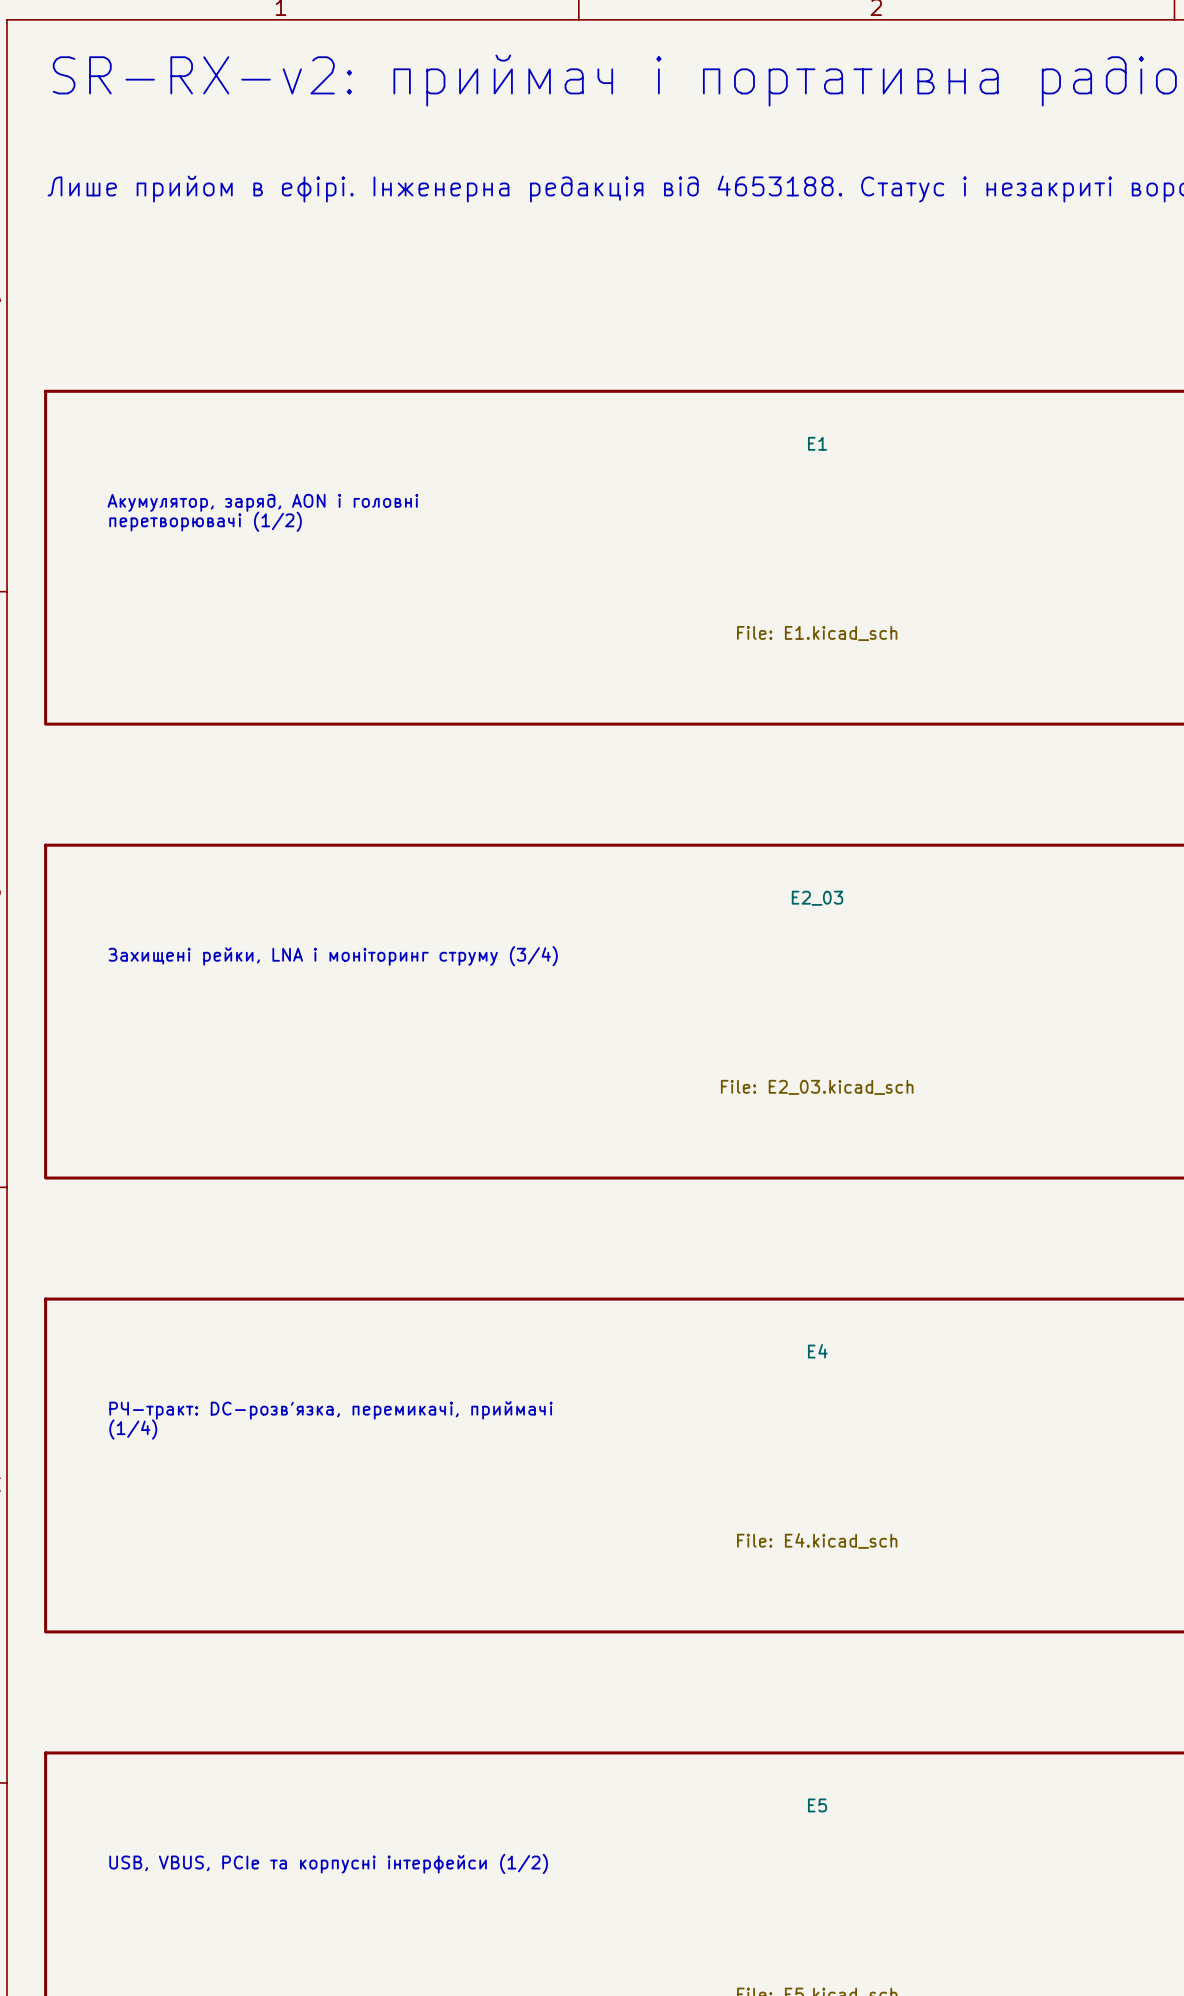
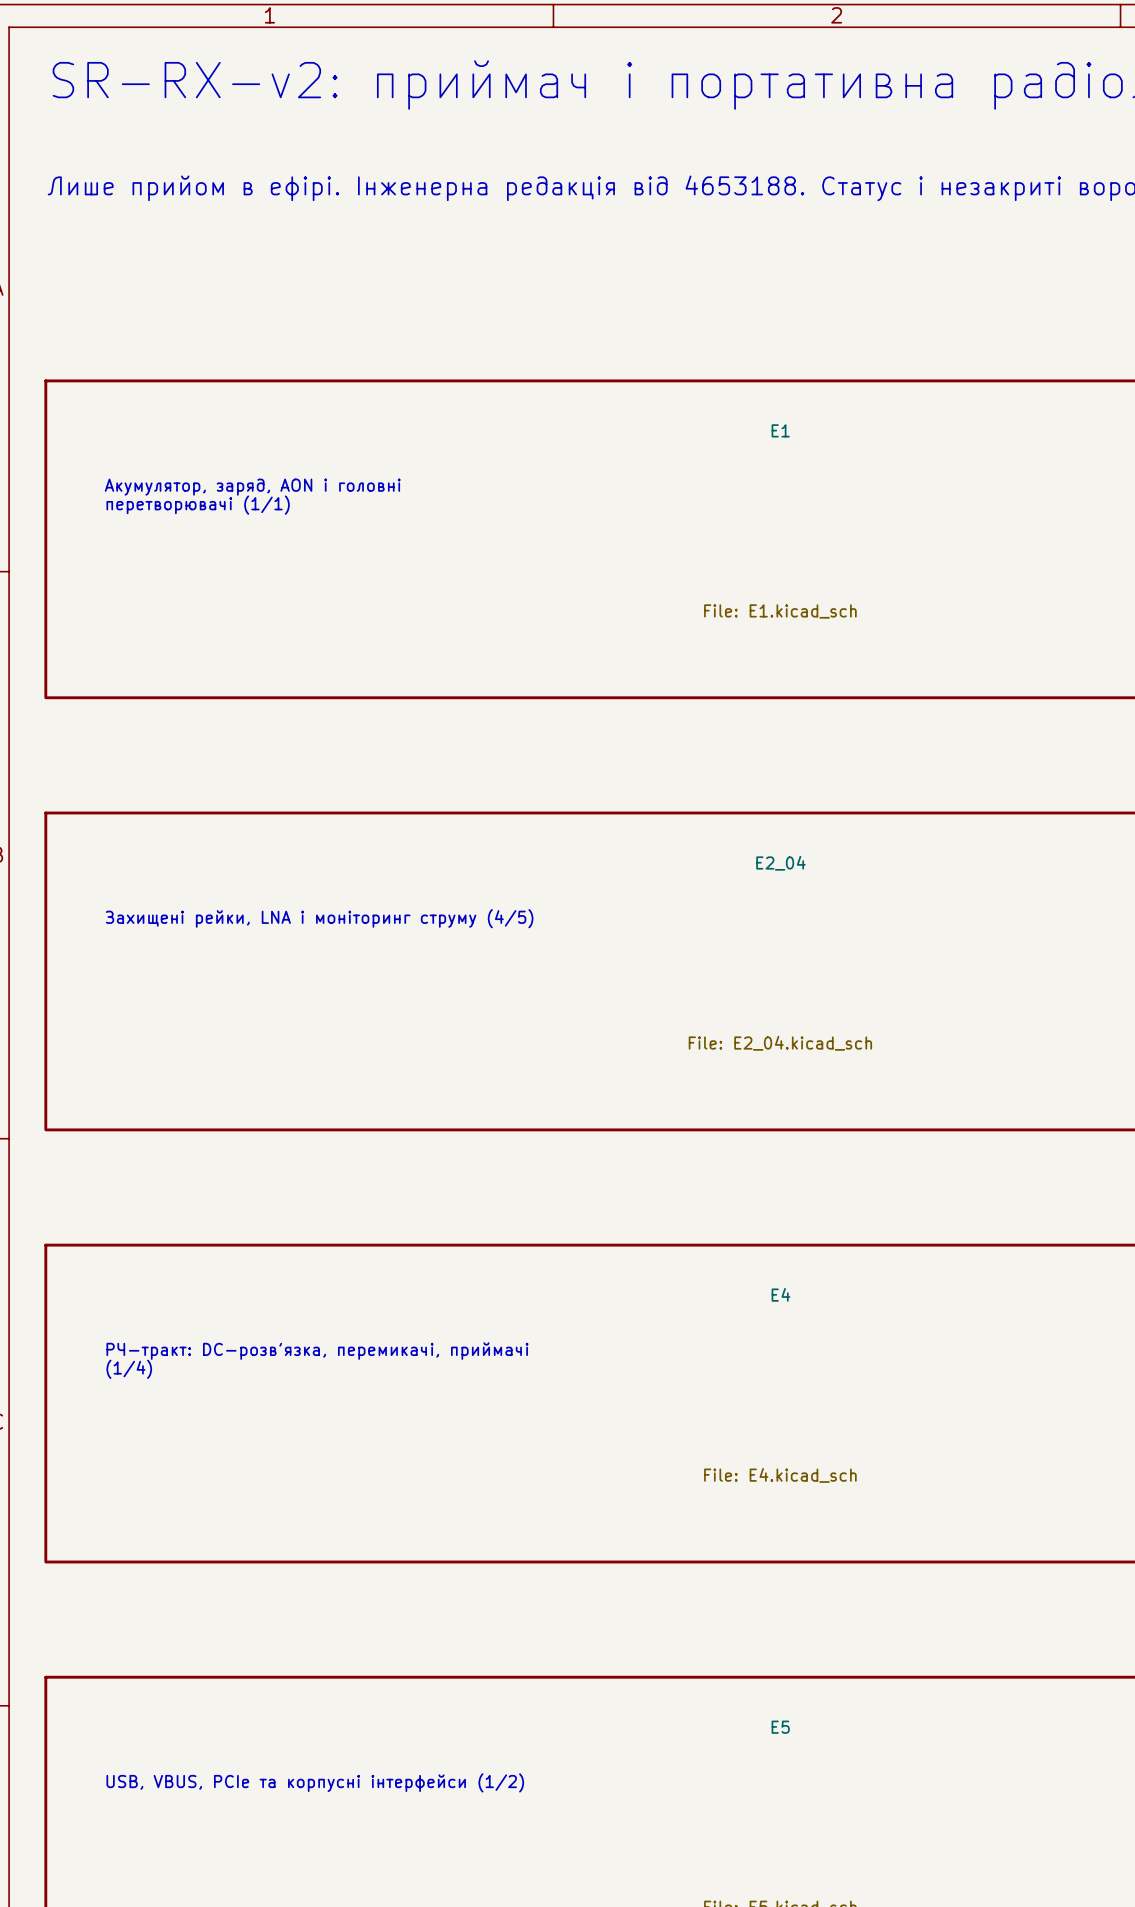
text: перетворювачі (1/2) (205, 521) -> перетворювачі (1/1) (198, 505)
sheet E2_03 name: E2_03 (817, 898) -> E2_04 (780, 863)
text: Захищені рейки, LNA і моніторинг струму (3/4) (333, 956) -> Захищені рейки, LNA і моніторинг струму (4/5) (319, 918)
sheet E2_03 value: File: E2_03.kicad_sch (817, 1087) -> File: E2_04.kicad_sch (780, 1043)

